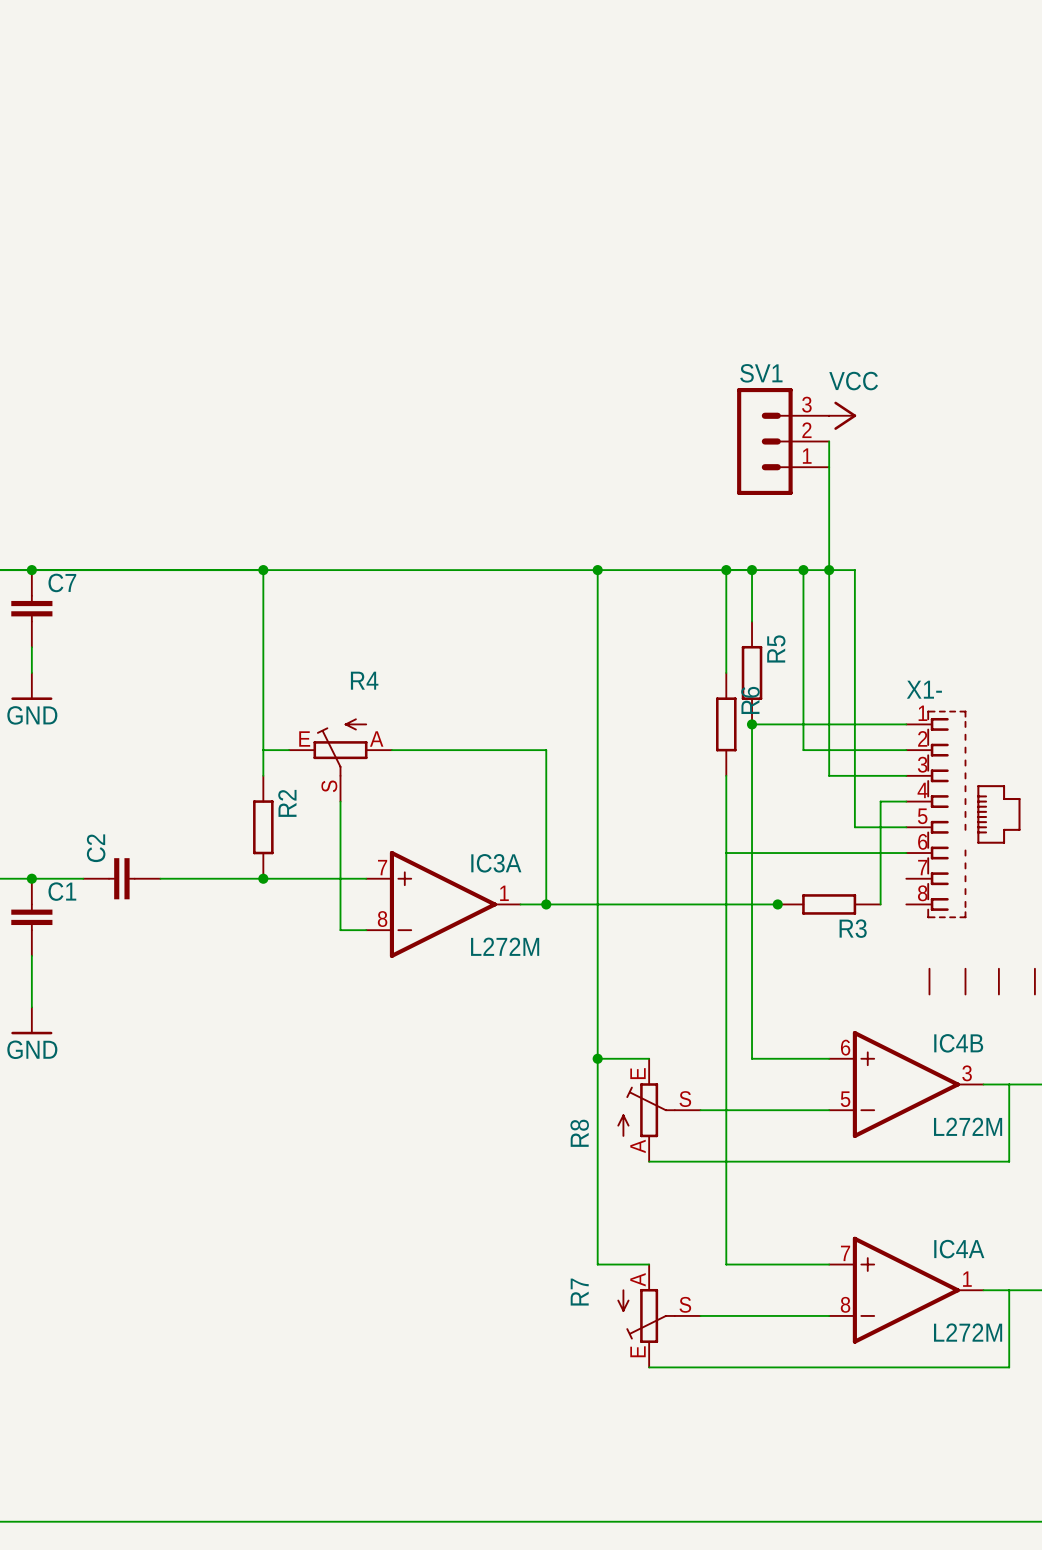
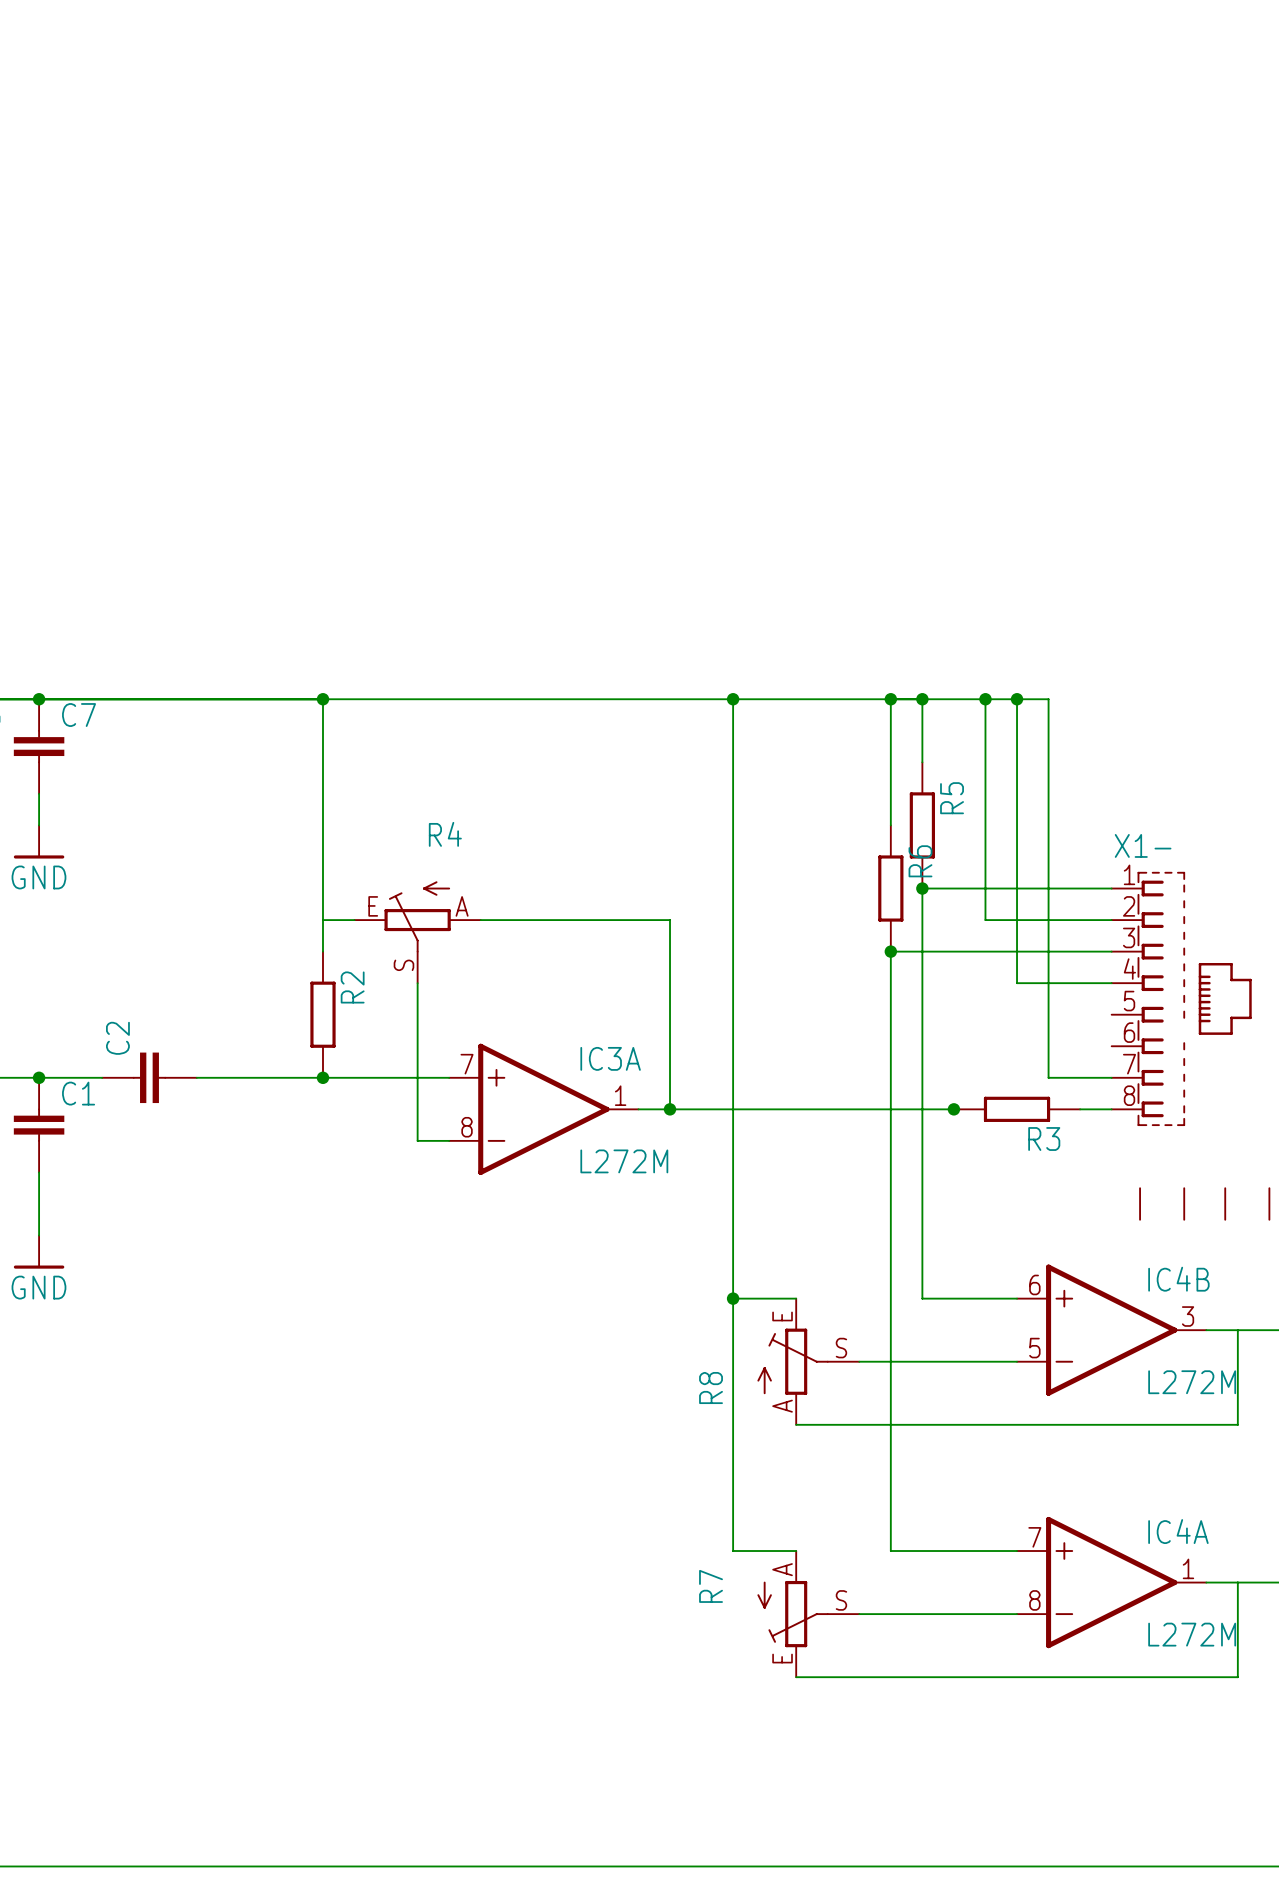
power symbol: VCC (842, 415) -> none
SV1: (783, 441) -> none
wire: (829, 441) (829, 570) -> none
wire: none -> (890, 951) (1017, 951) (1017, 983) (1080, 983)
junction: none -> (890, 951)
wire: (880, 801) (880, 904) -> (1111, 1109) (1080, 1109)
wire: (854, 827) (906, 827) -> (1048, 1014) (1048, 1077) (1111, 1077)
wire: (726, 853) (906, 853) -> none

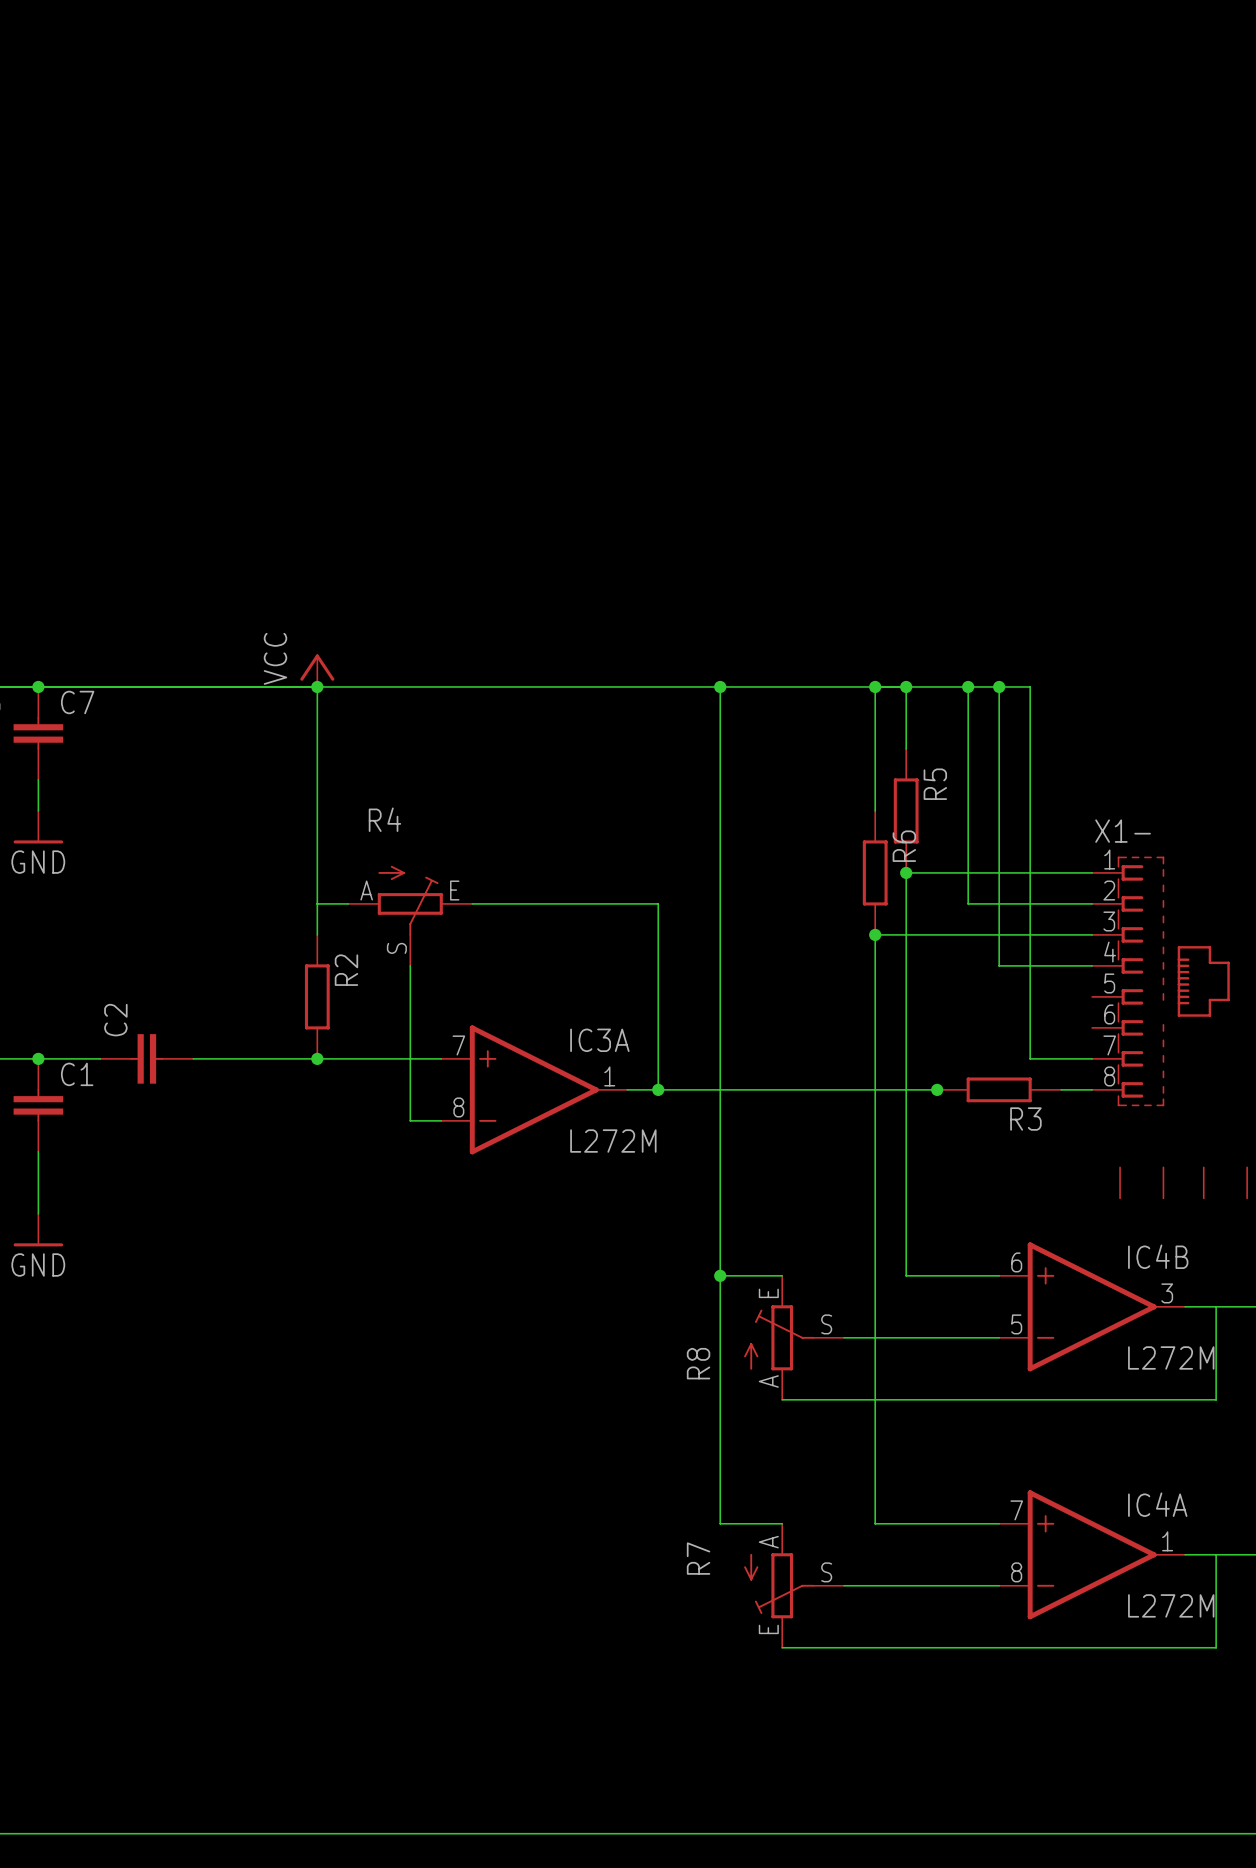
power symbol: none -> VCC (317, 670)
R4 flip: as is (417, 916) -> left-right (410, 900)

